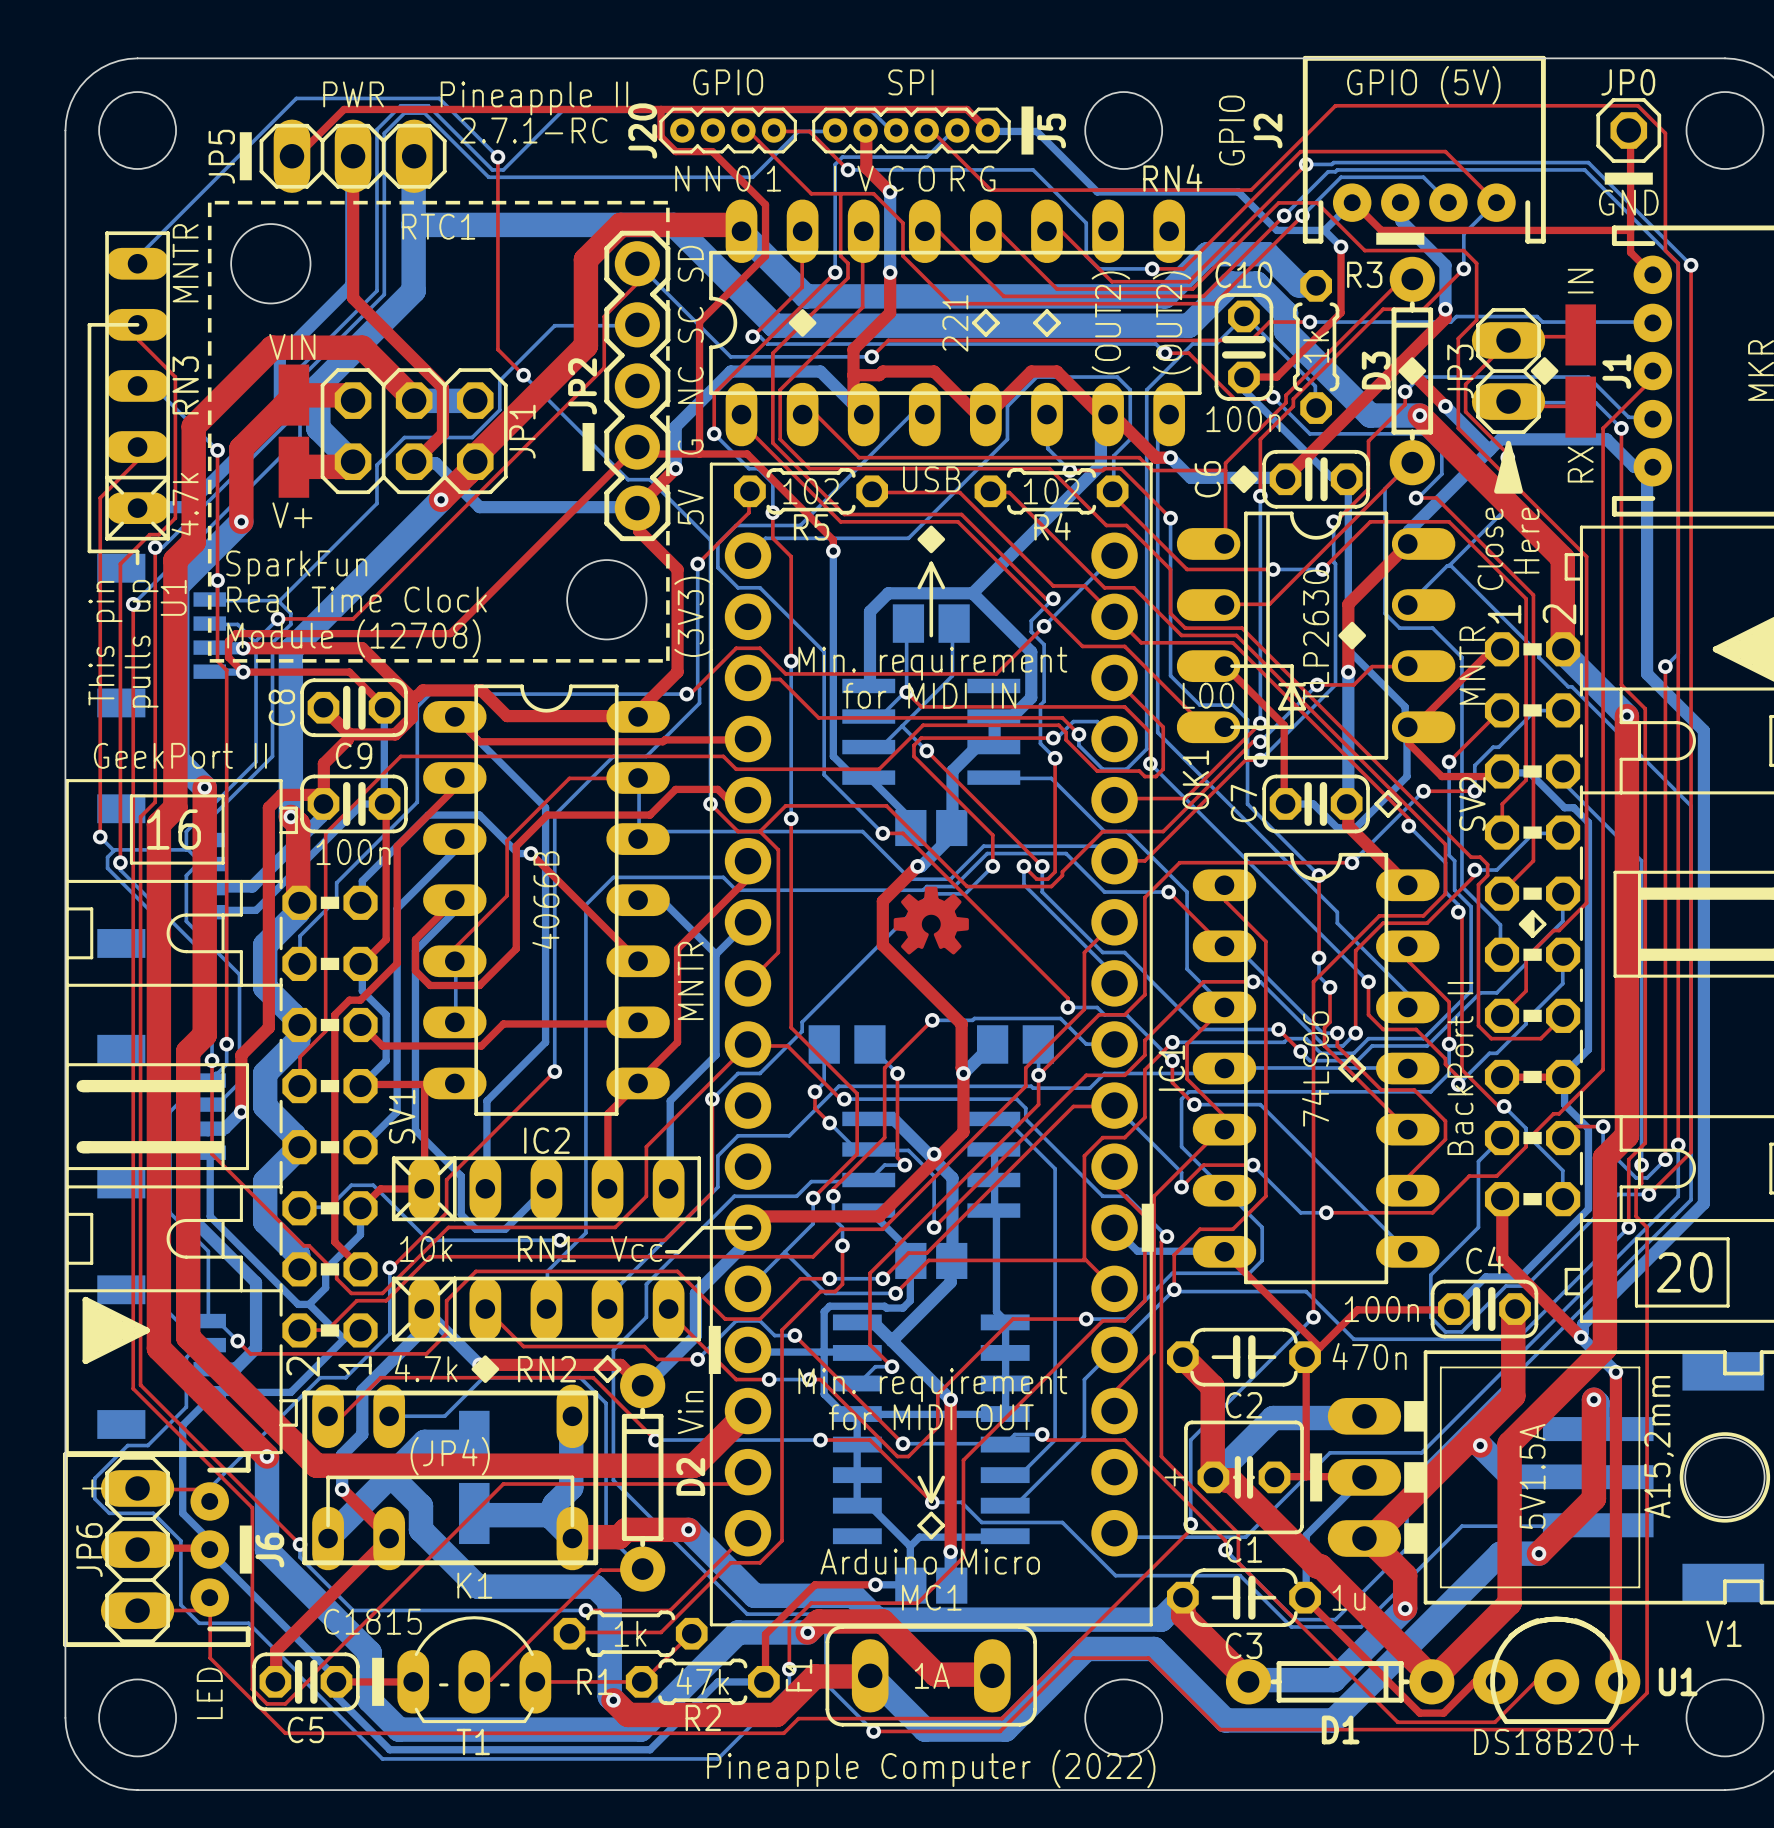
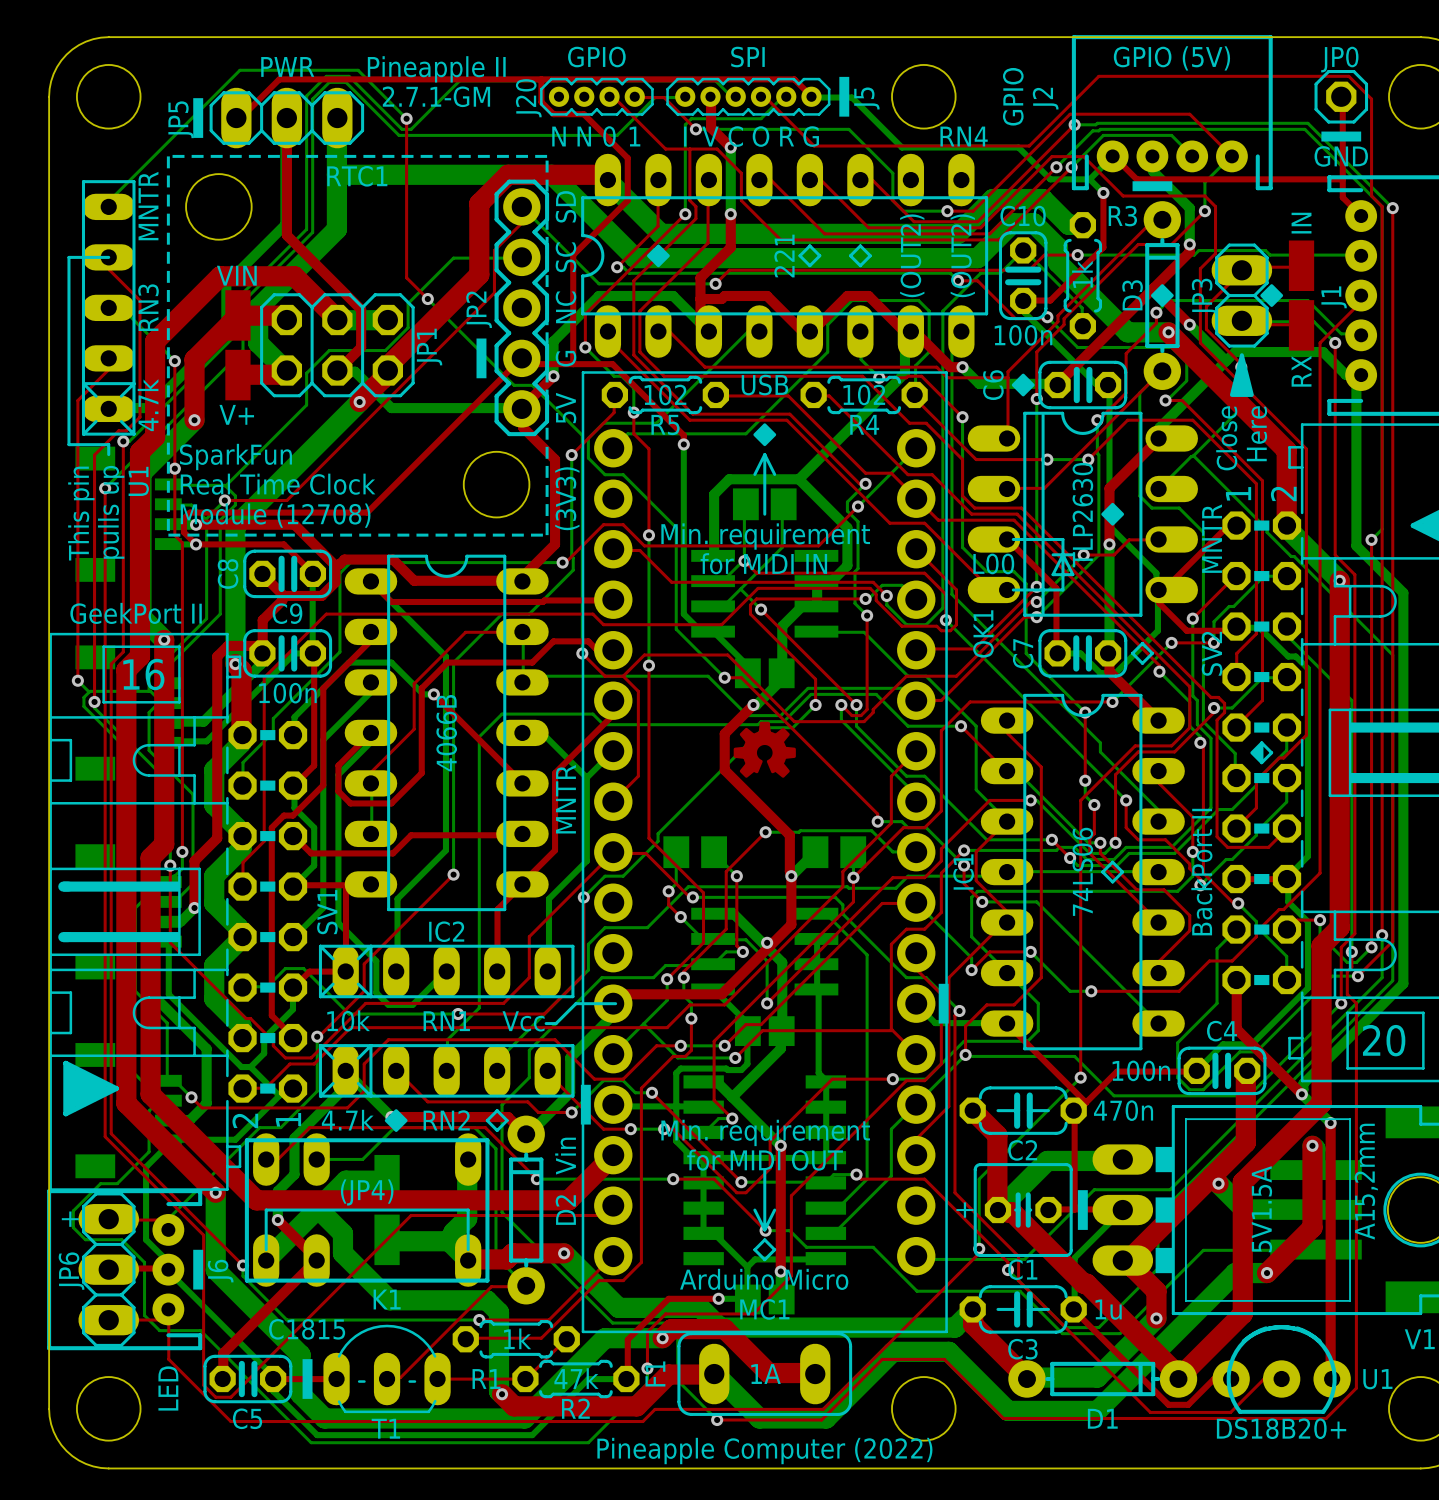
text: 2.7.1-RC (533, 130) -> 2.7.1-GM (436, 96)

